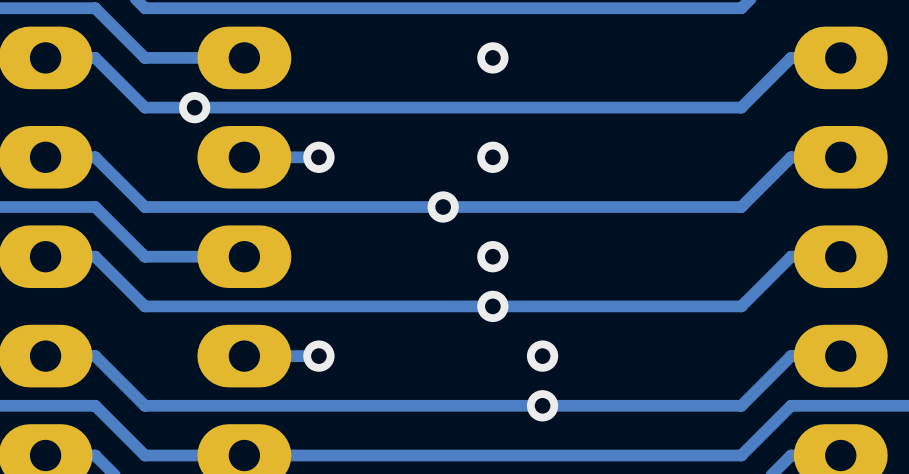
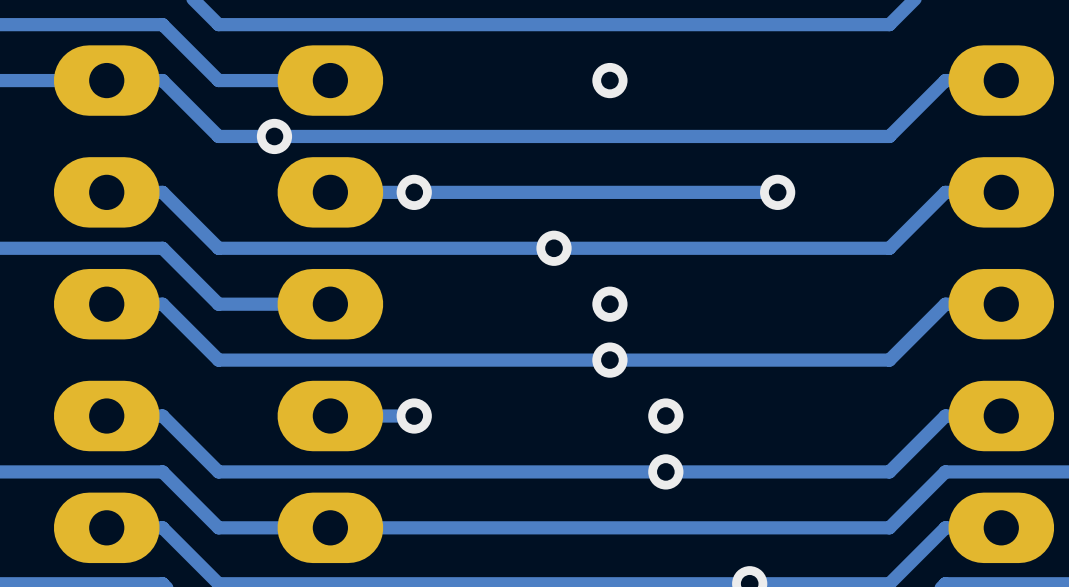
via position: (492, 157) -> (777, 192)
track: none -> (777, 192) (414, 192)

